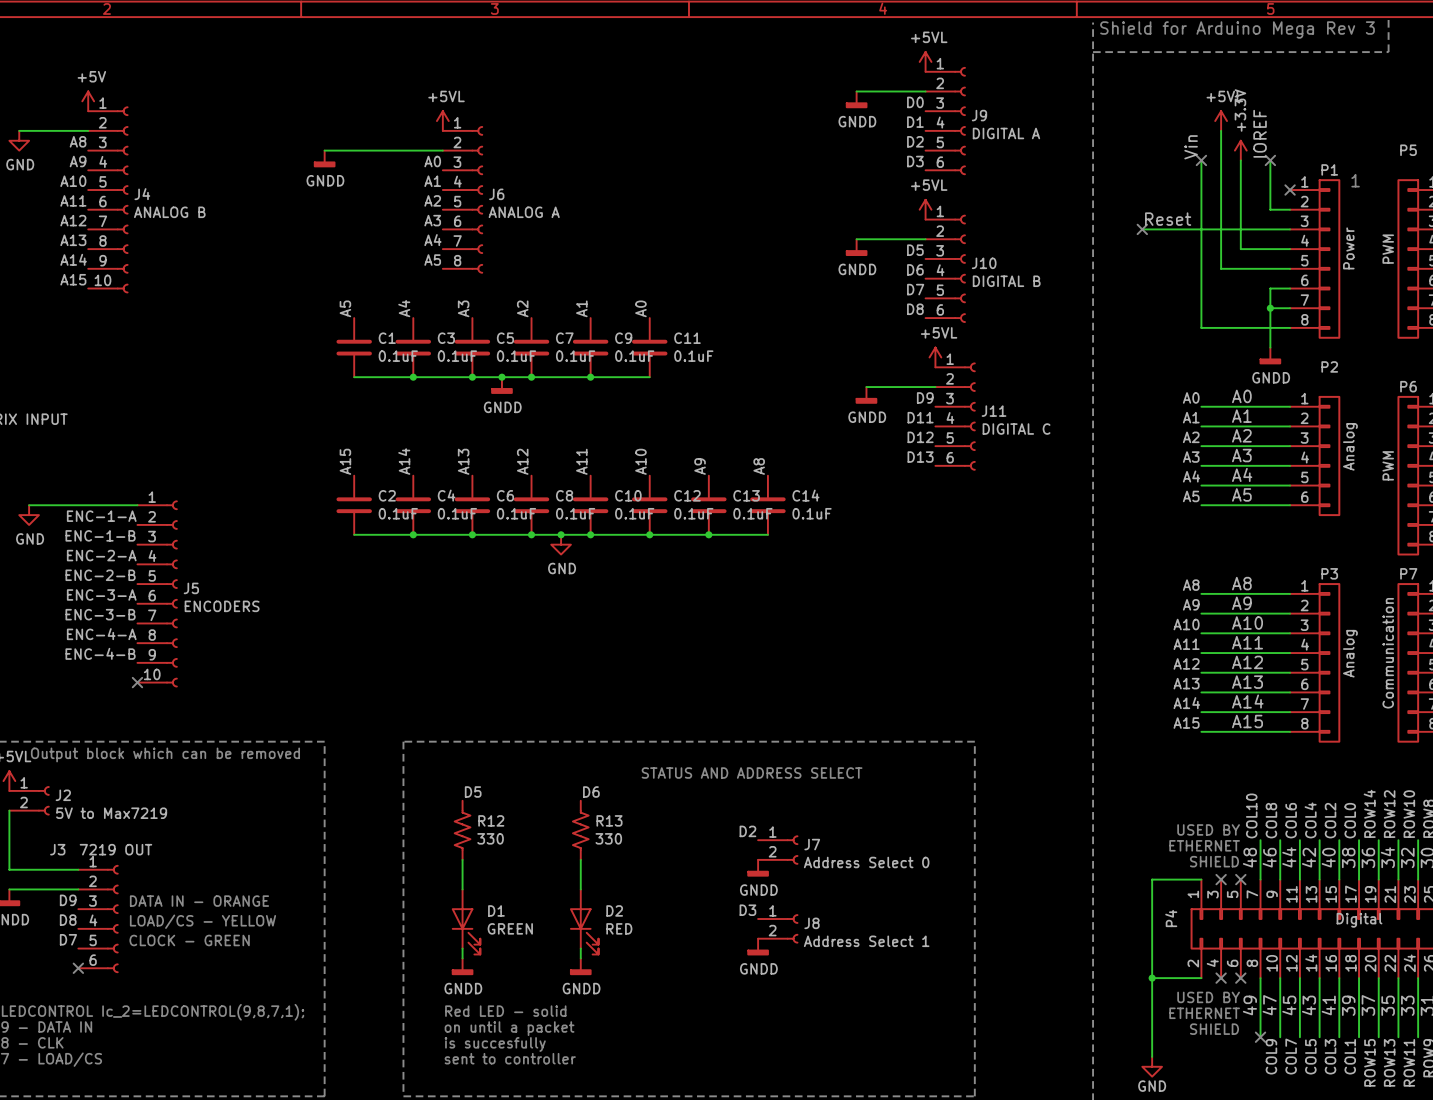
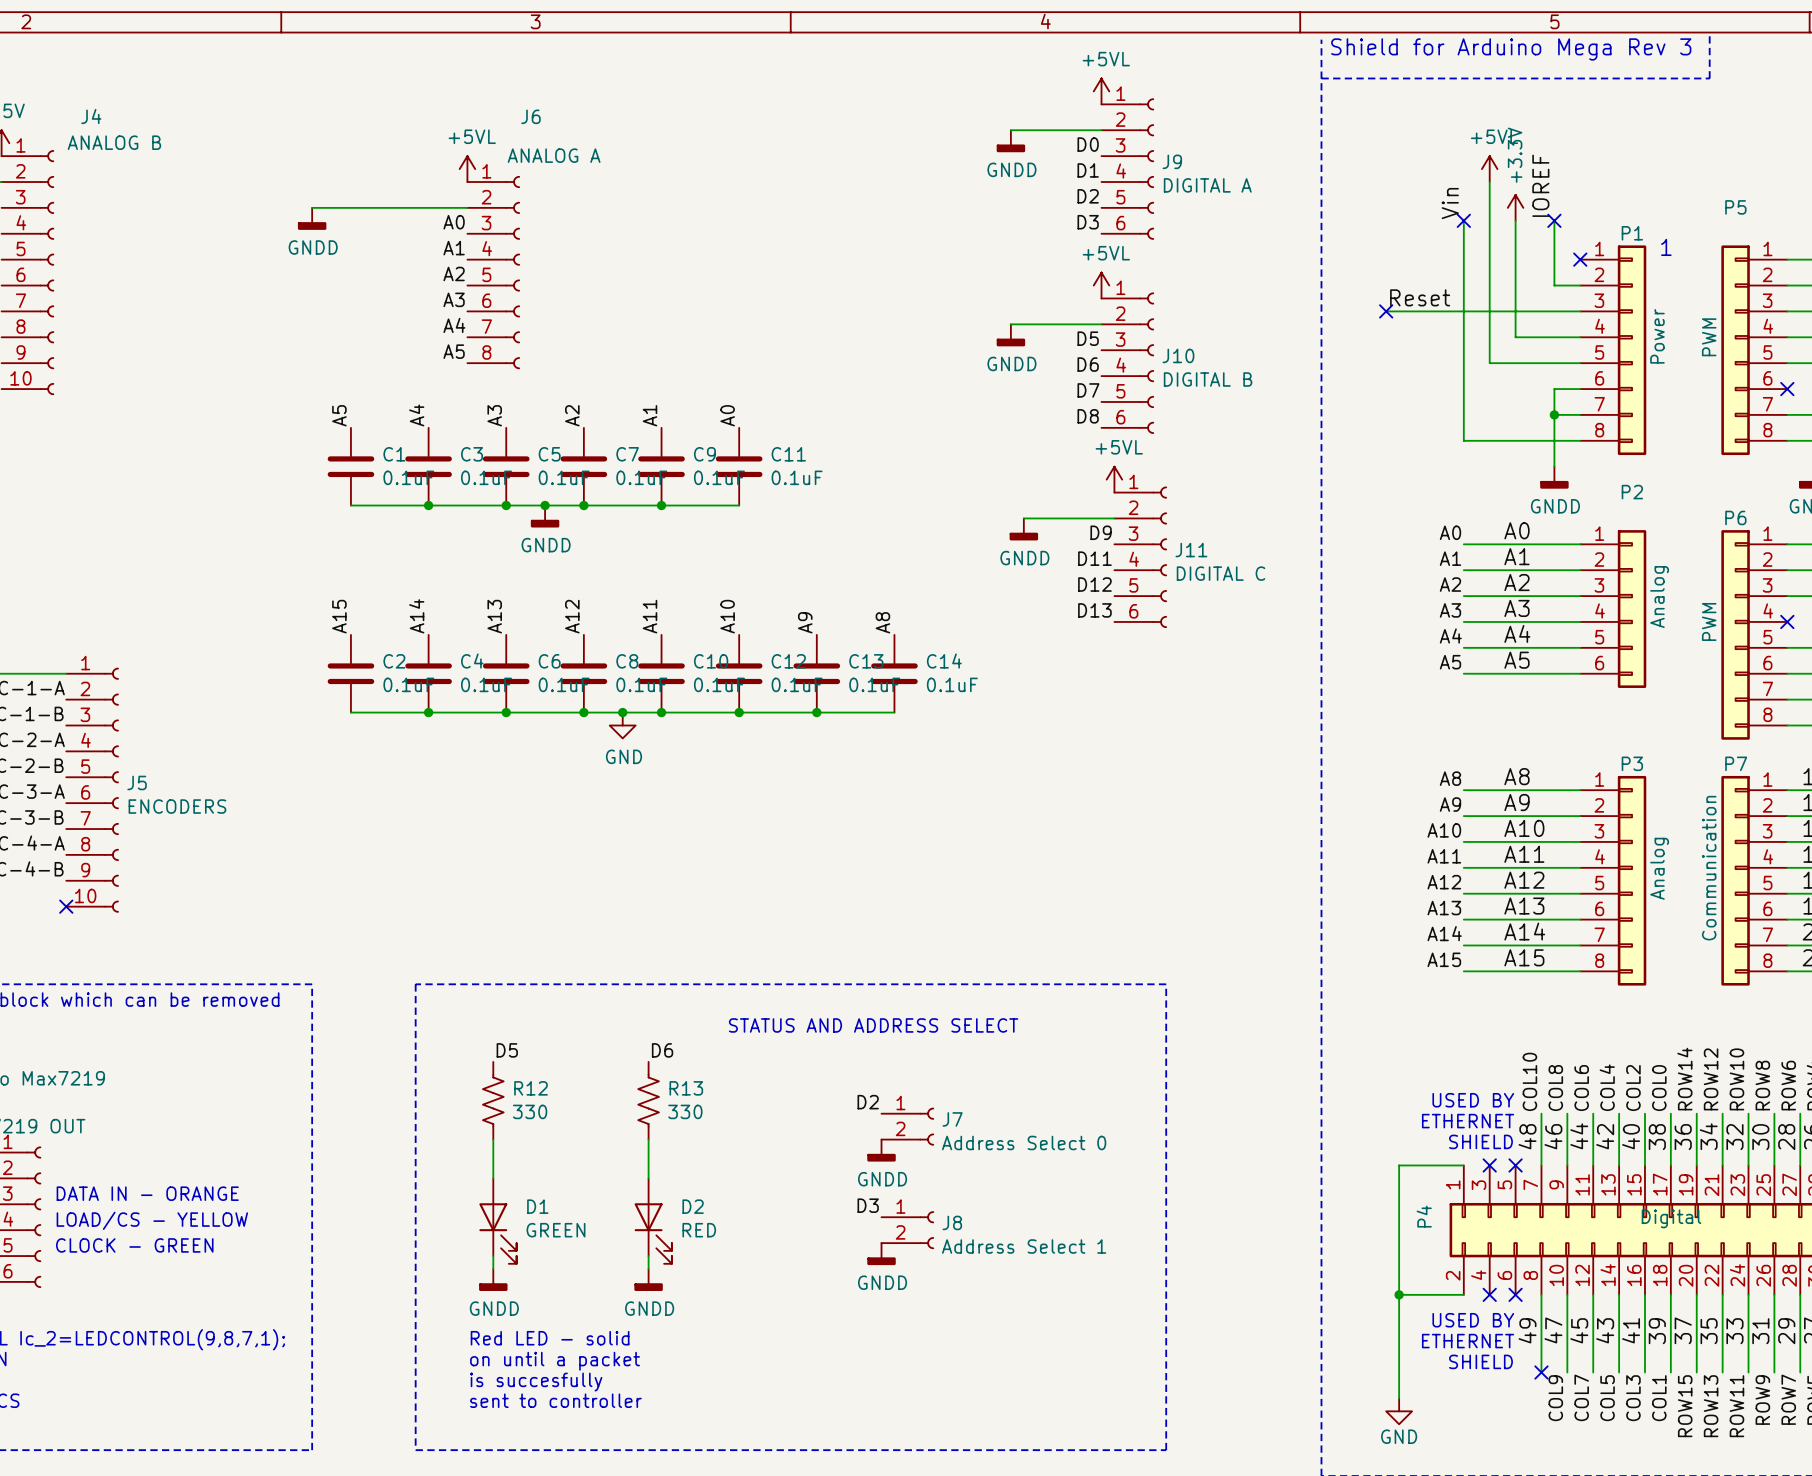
J4 name position: J4 (142, 194) -> J4 (91, 116)
J6 name position: J6 (496, 194) -> J6 (530, 116)
J4 value position: ANALOG B (169, 212) -> ANALOG B (114, 142)
J6 value position: ANALOG A (524, 212) -> ANALOG A (554, 155)

